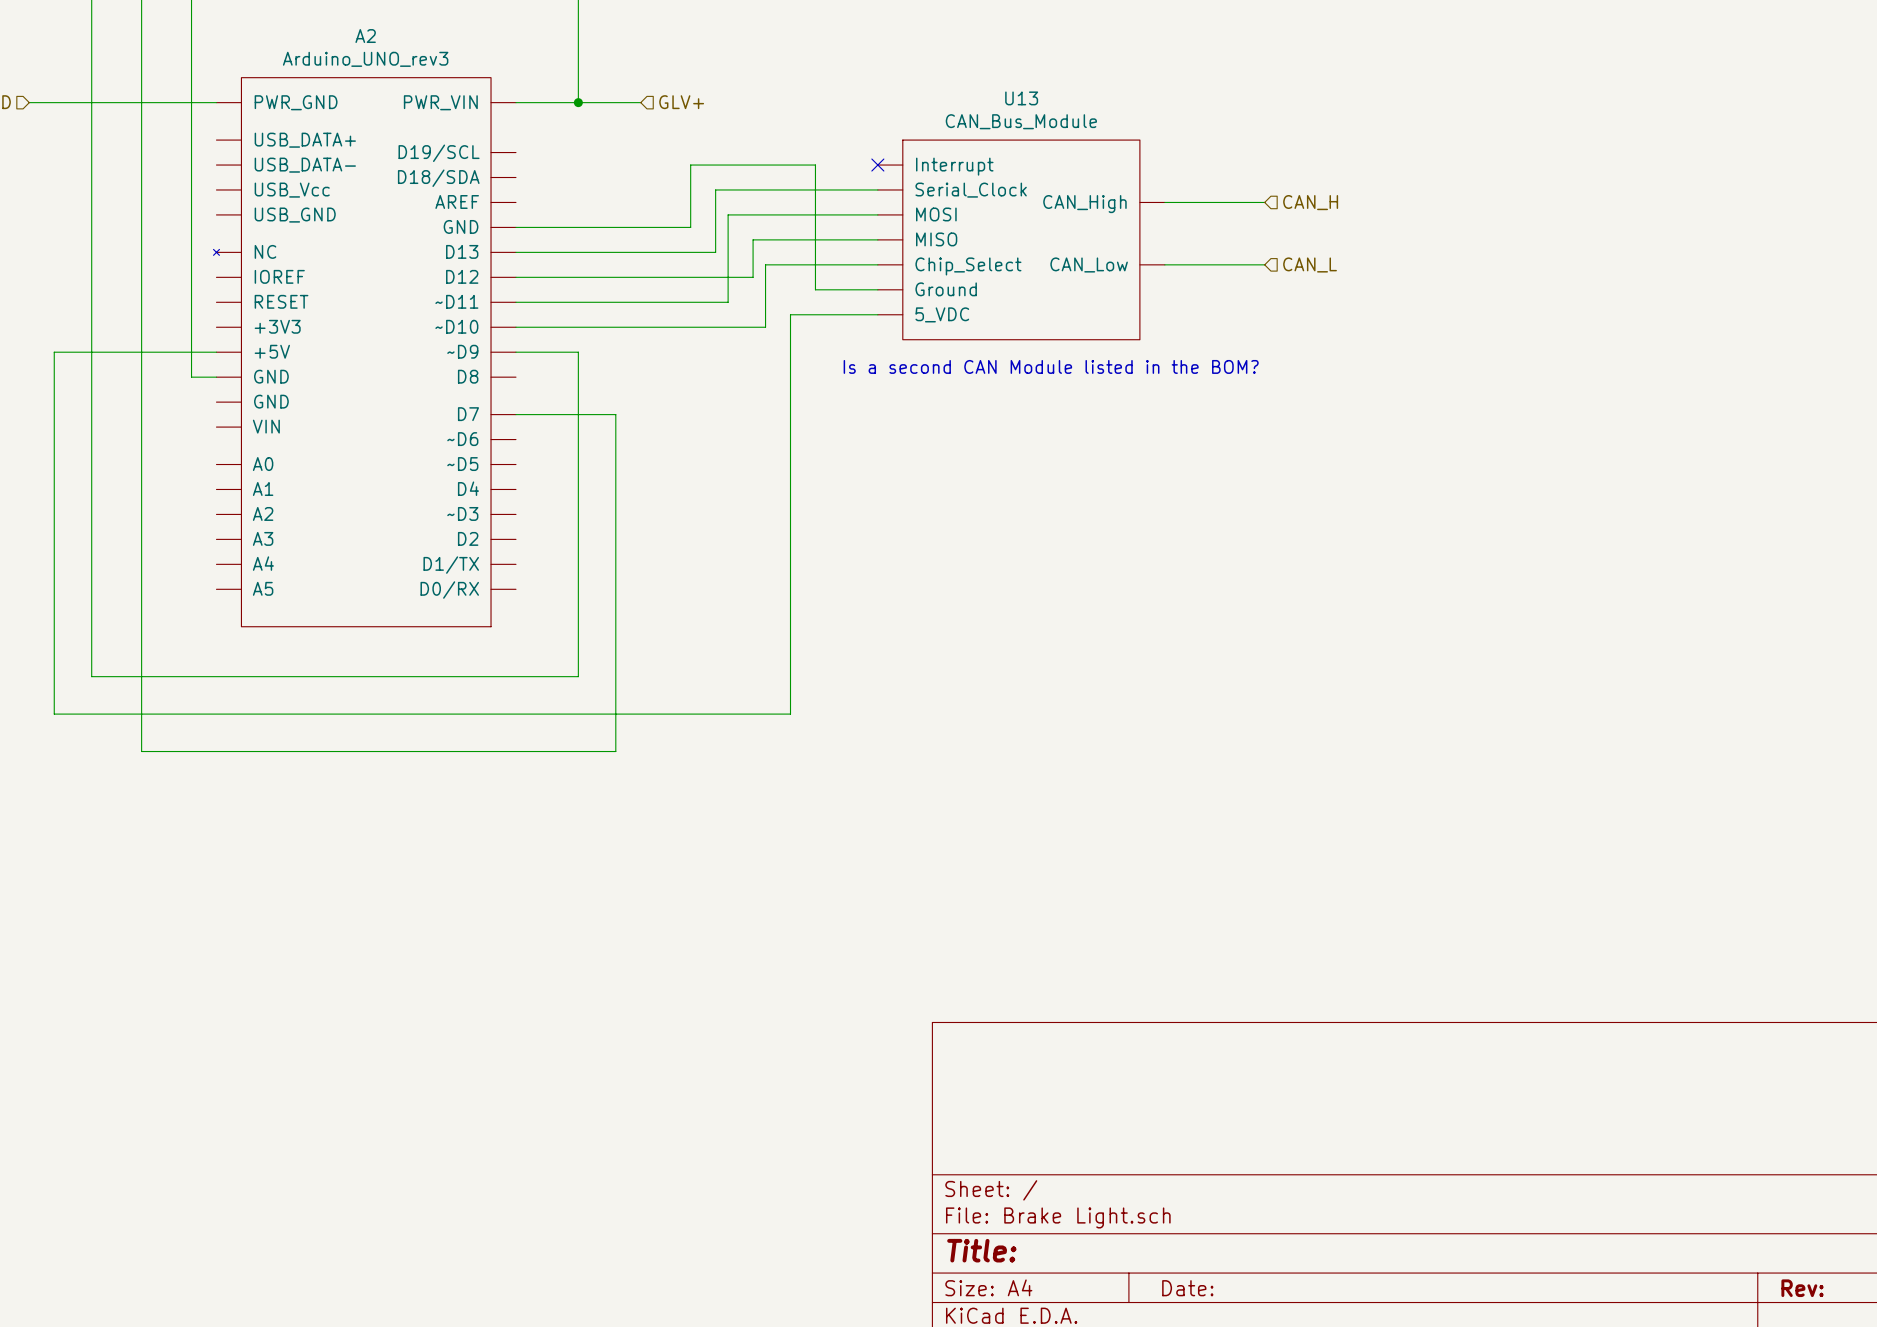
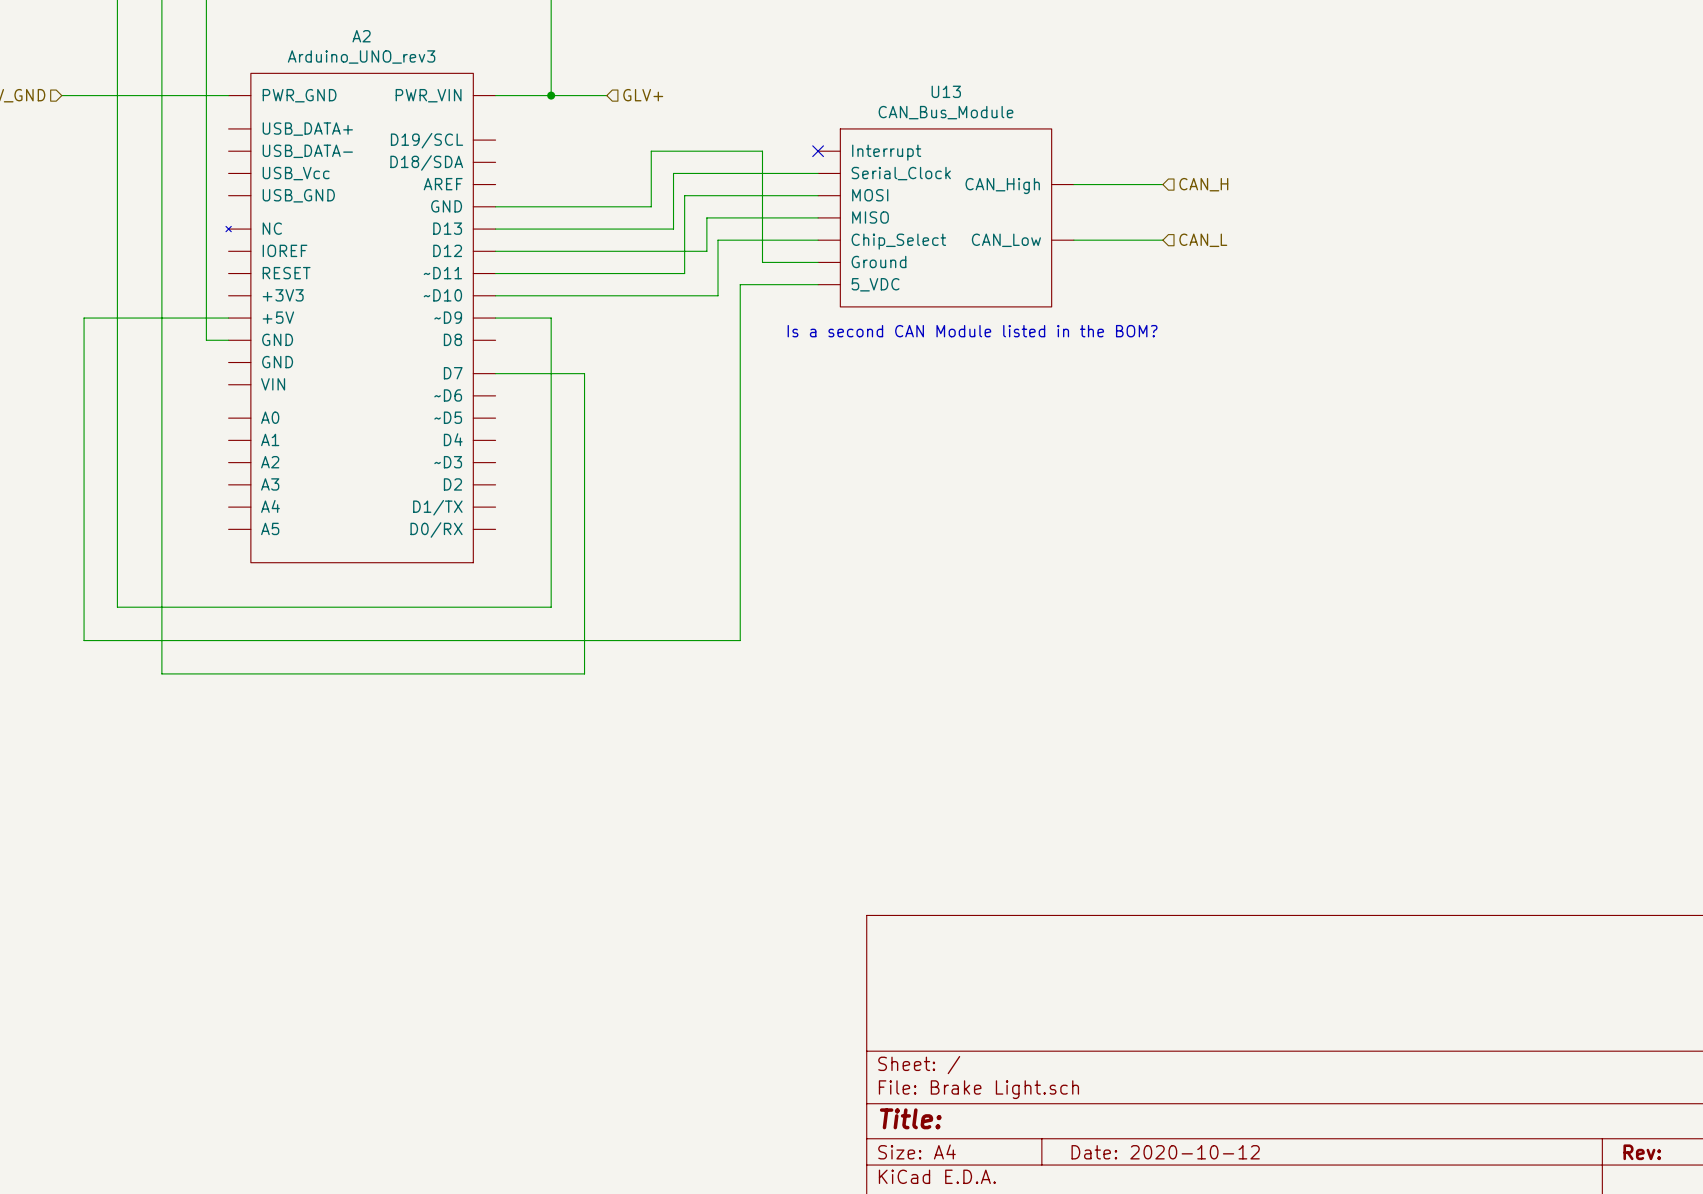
title block: Date: (1187, 1288) -> Date: 2020-10-12 (1165, 1152)

